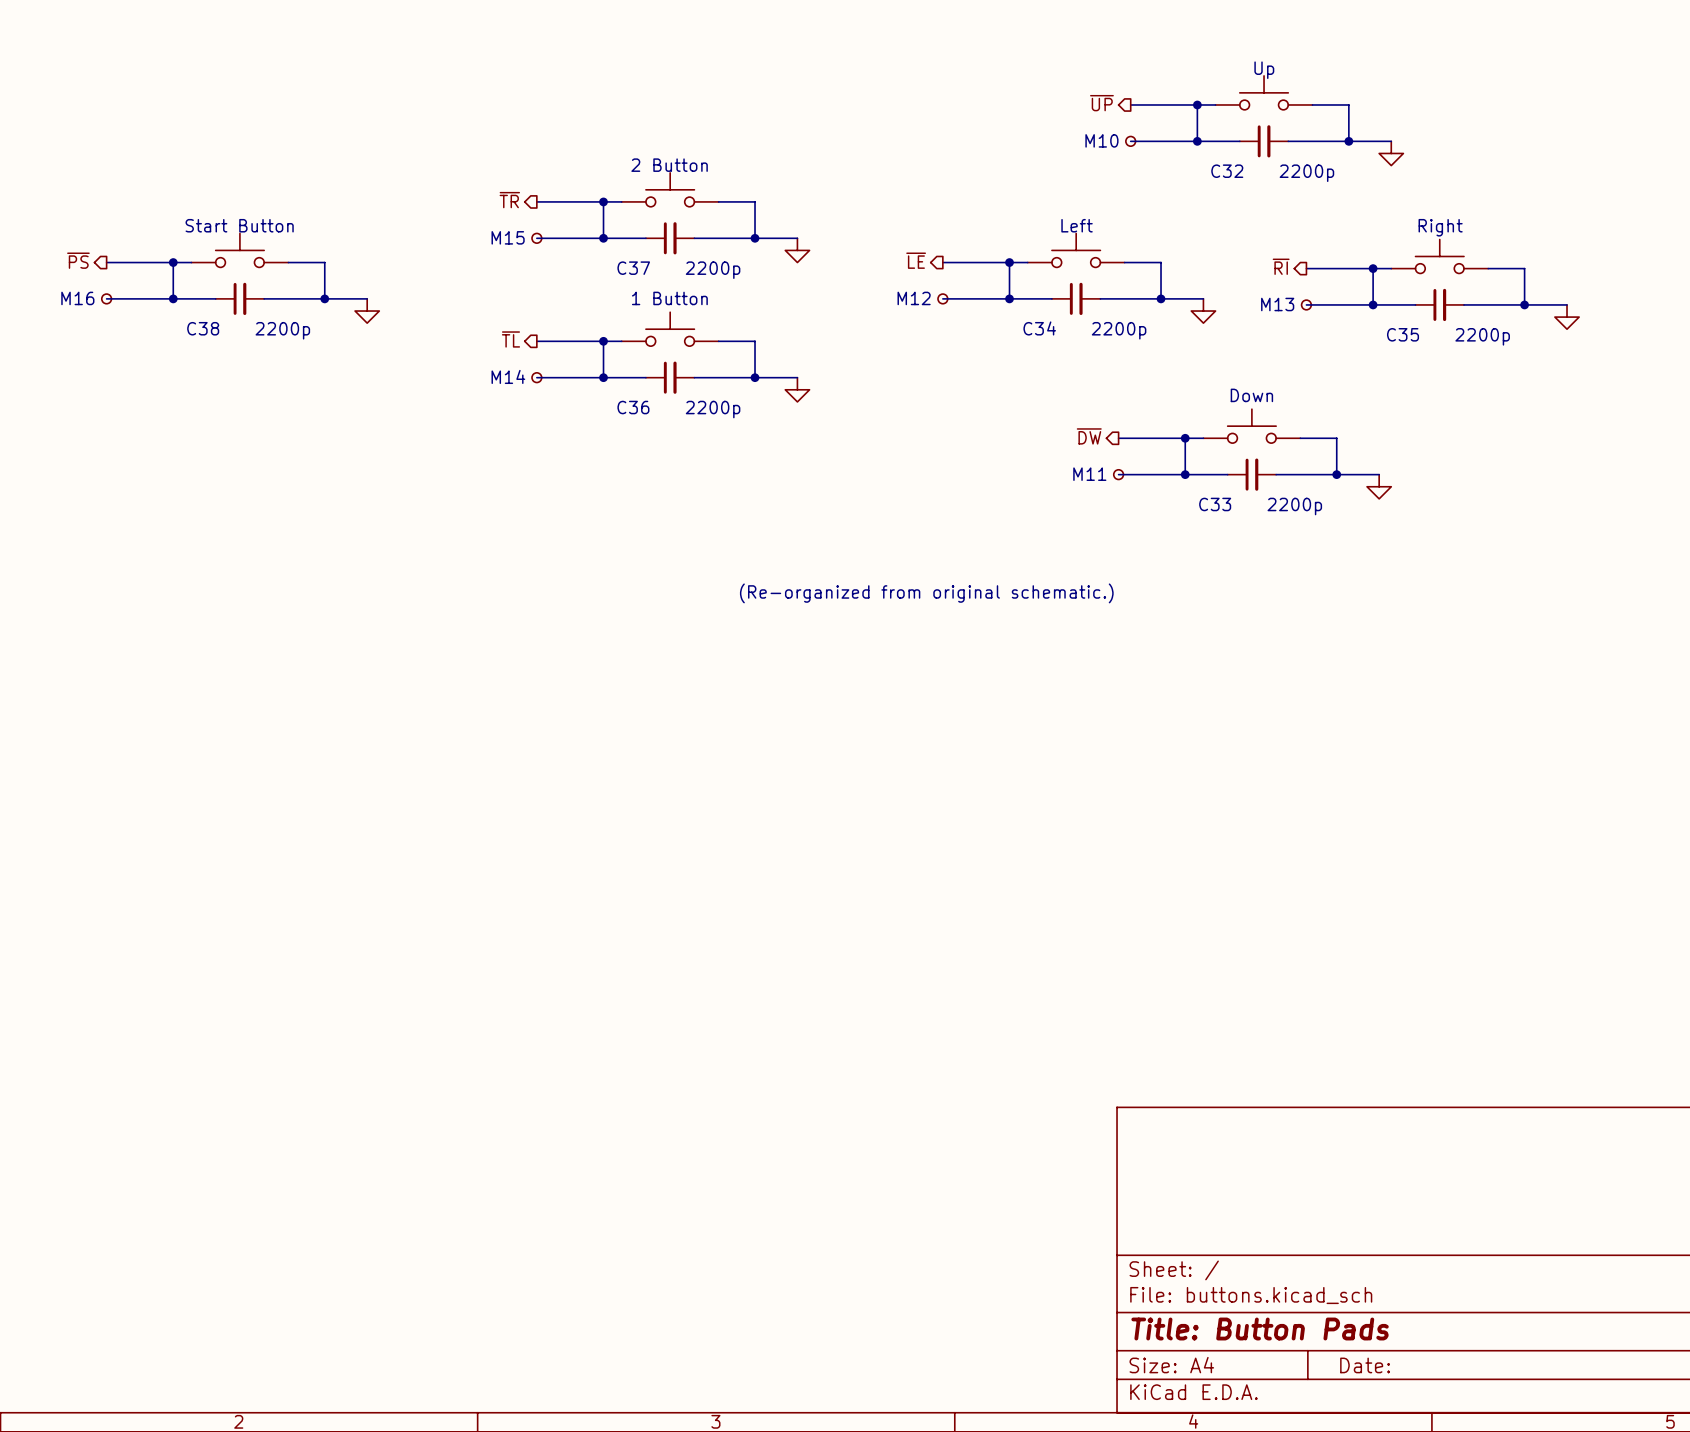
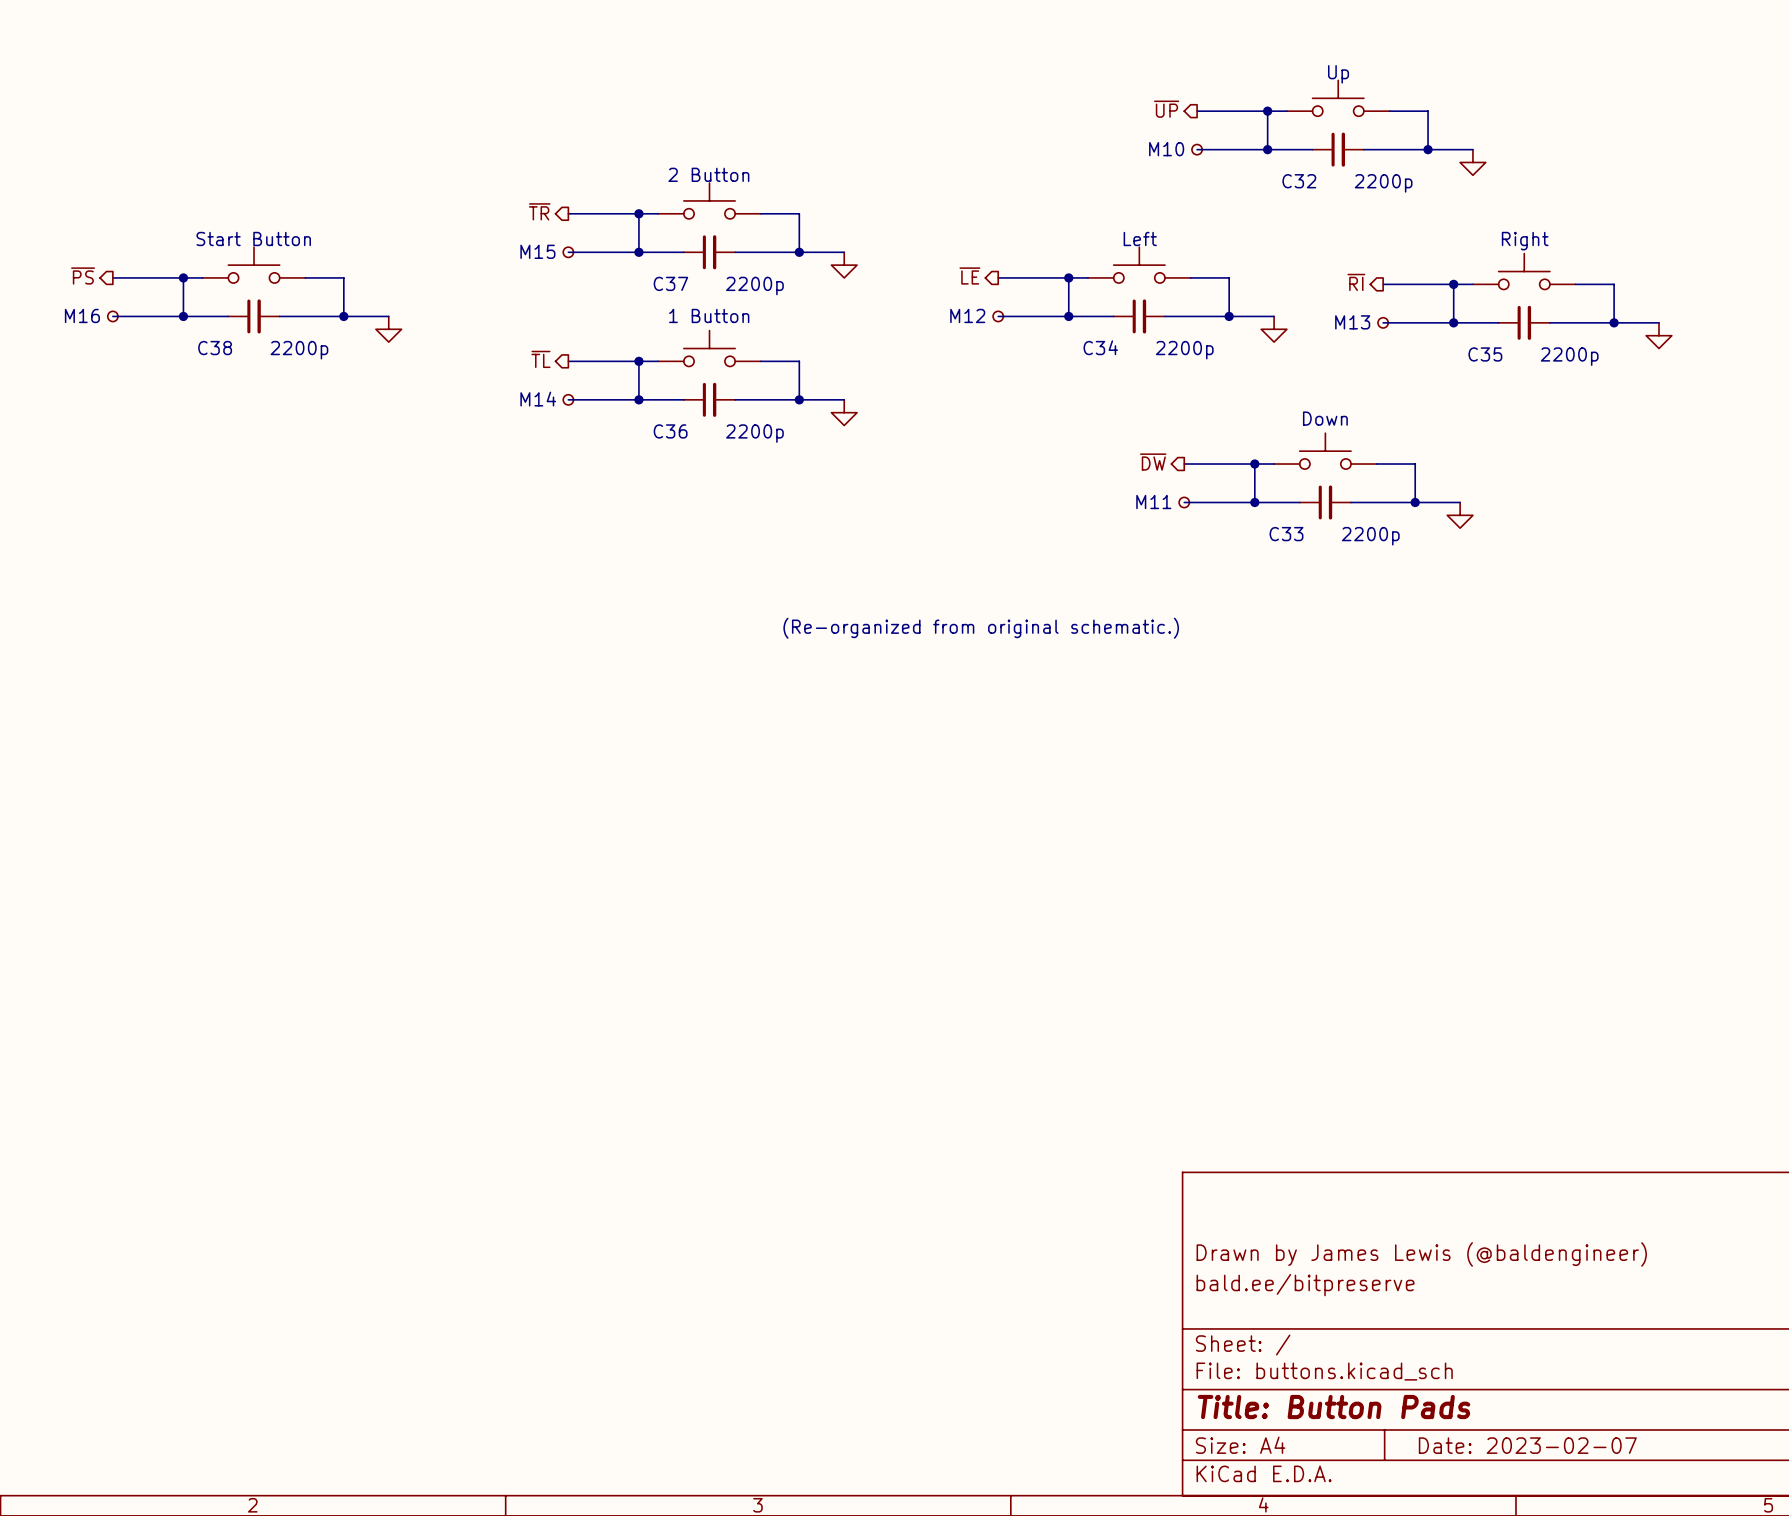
title block: none -> Drawn by James Lewis (@baldengineer) (1421, 1254)
title block: none -> bald.ee/bitpreserve (1305, 1285)
title block: Date: (1365, 1365) -> Date: 2023-02-07 (1527, 1445)

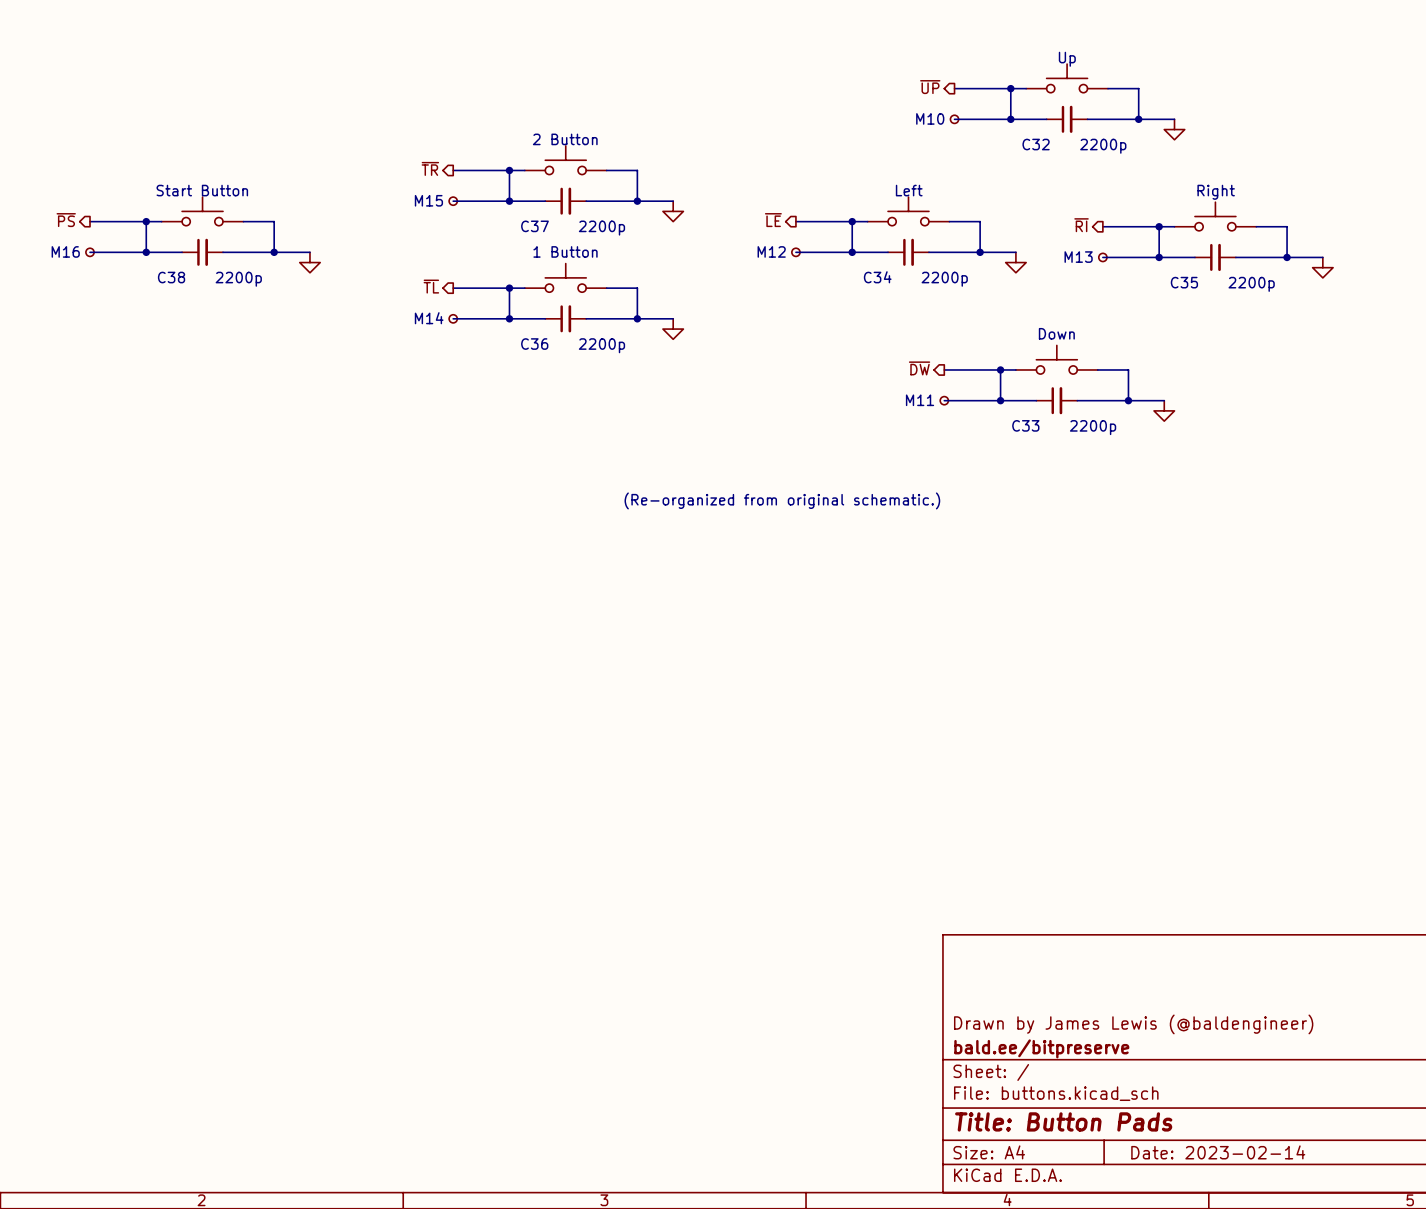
title block: Drawn by James Lewis (@baldengineer) (1421, 1254) -> none
title block: bald.ee/bitpreserve (1305, 1285) -> Drawn by James Lewis (@baldengineer) (1133, 1024)
title block: none -> bald.ee/bitpreserve (1041, 1048)
title block: Date: 2023-02-07 (1527, 1445) -> Date: 2023-02-14 (1218, 1152)

